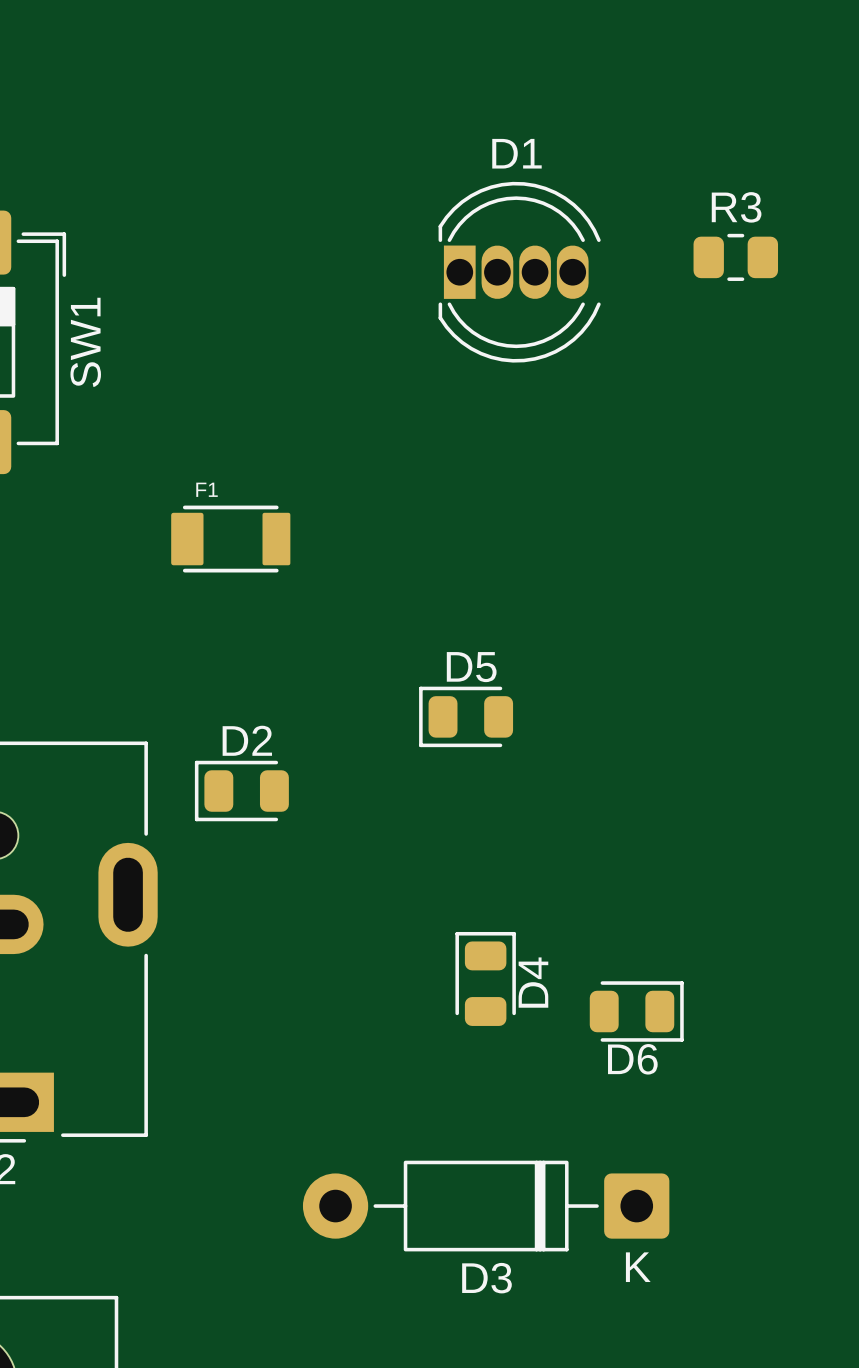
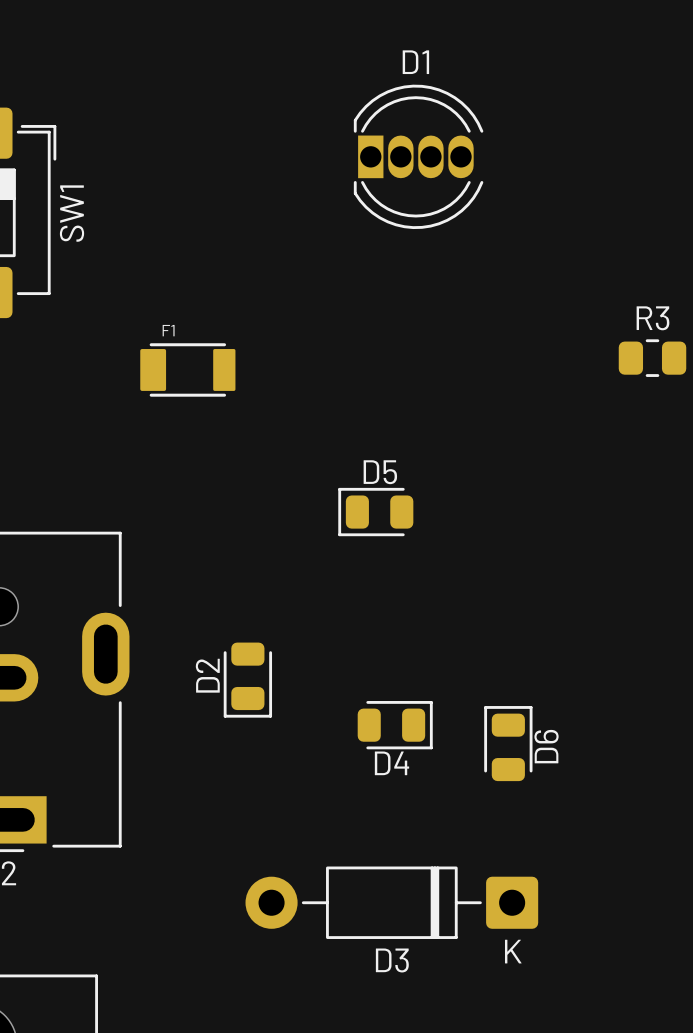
R3 position: (735, 257) -> (652, 358)
D2 rotation: 0° (241, 791) -> 90° counterclockwise (247, 680)
D2 position: (241, 791) -> (247, 680)
D4 rotation: 0° (485, 978) -> 90° clockwise (395, 725)
D6 rotation: 0° (636, 1011) -> 90° counterclockwise (508, 743)

